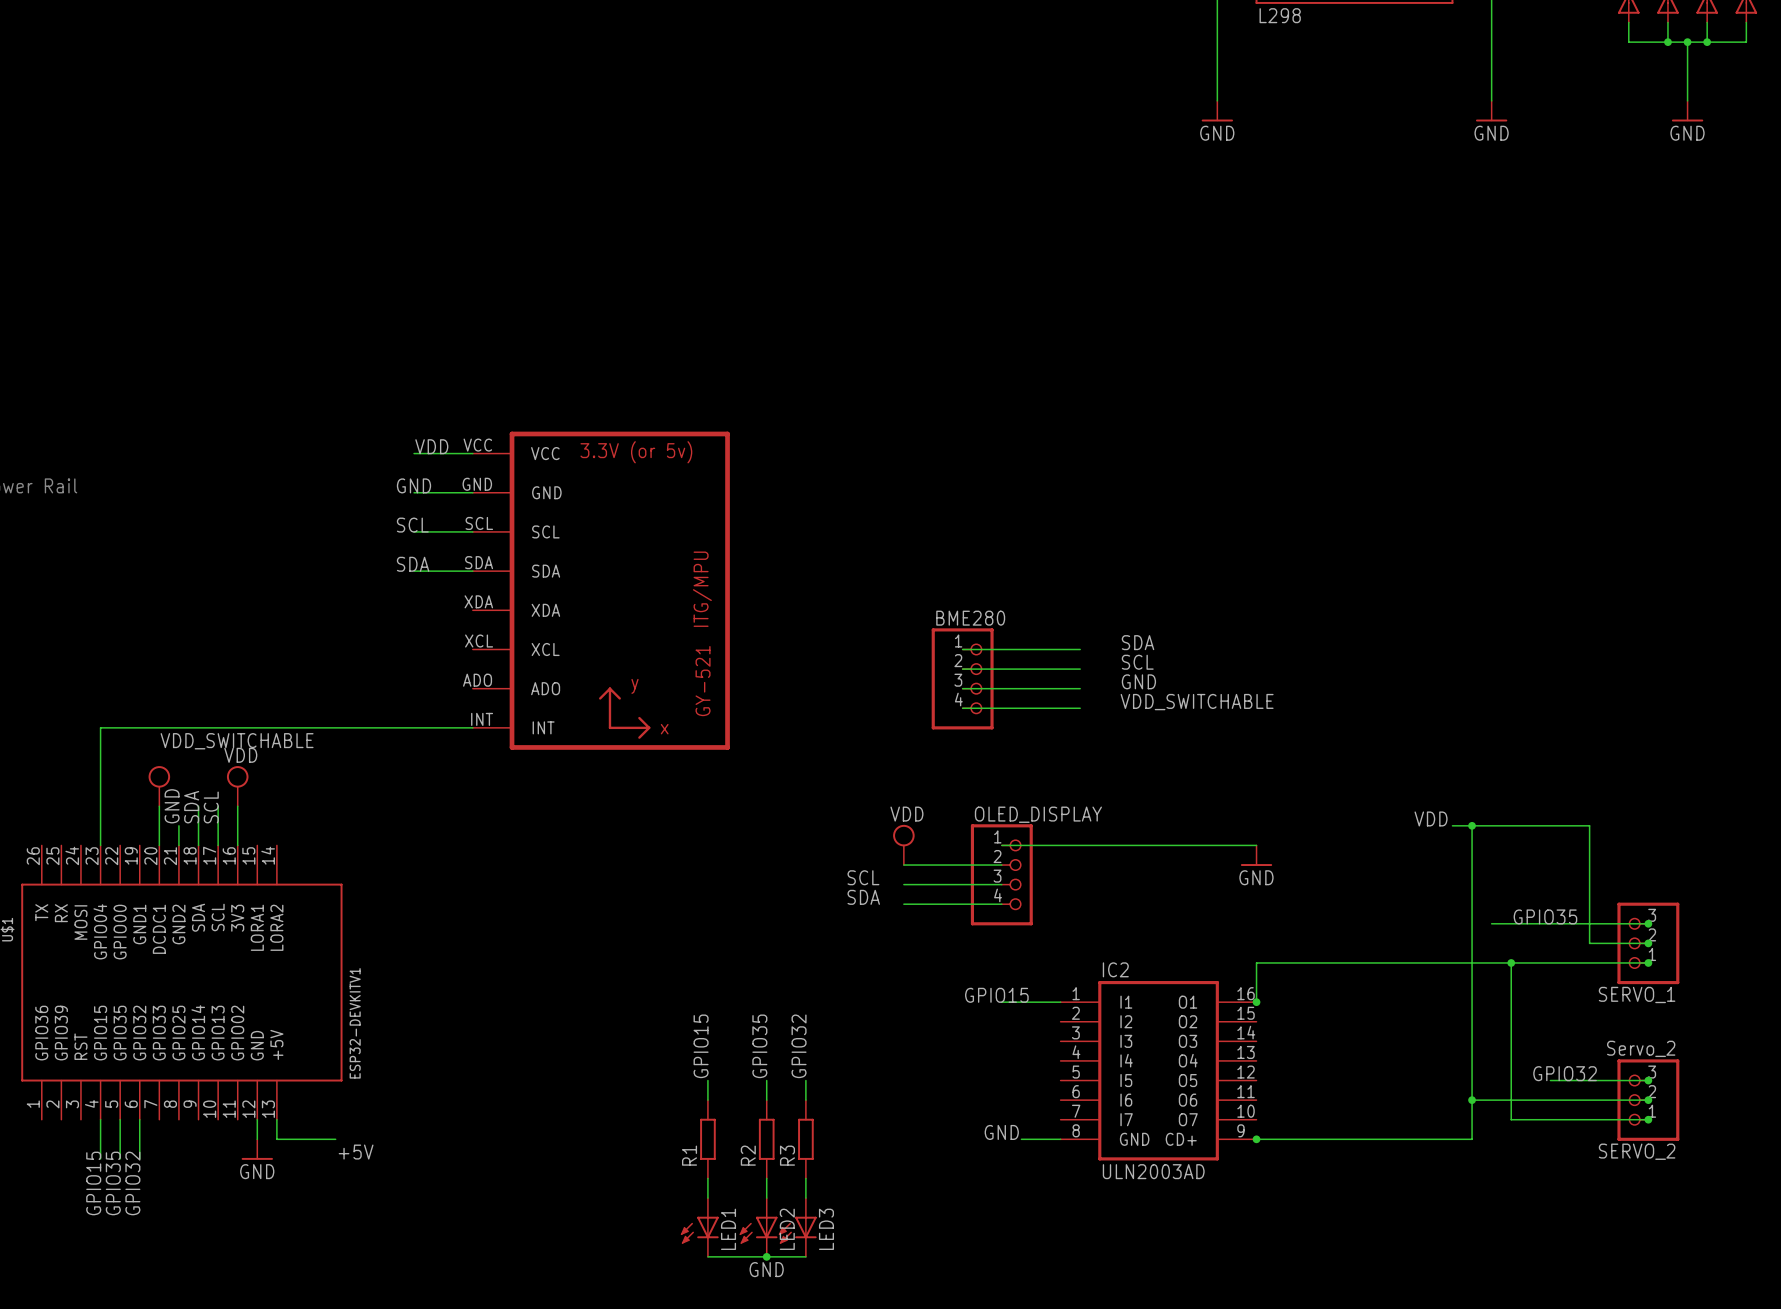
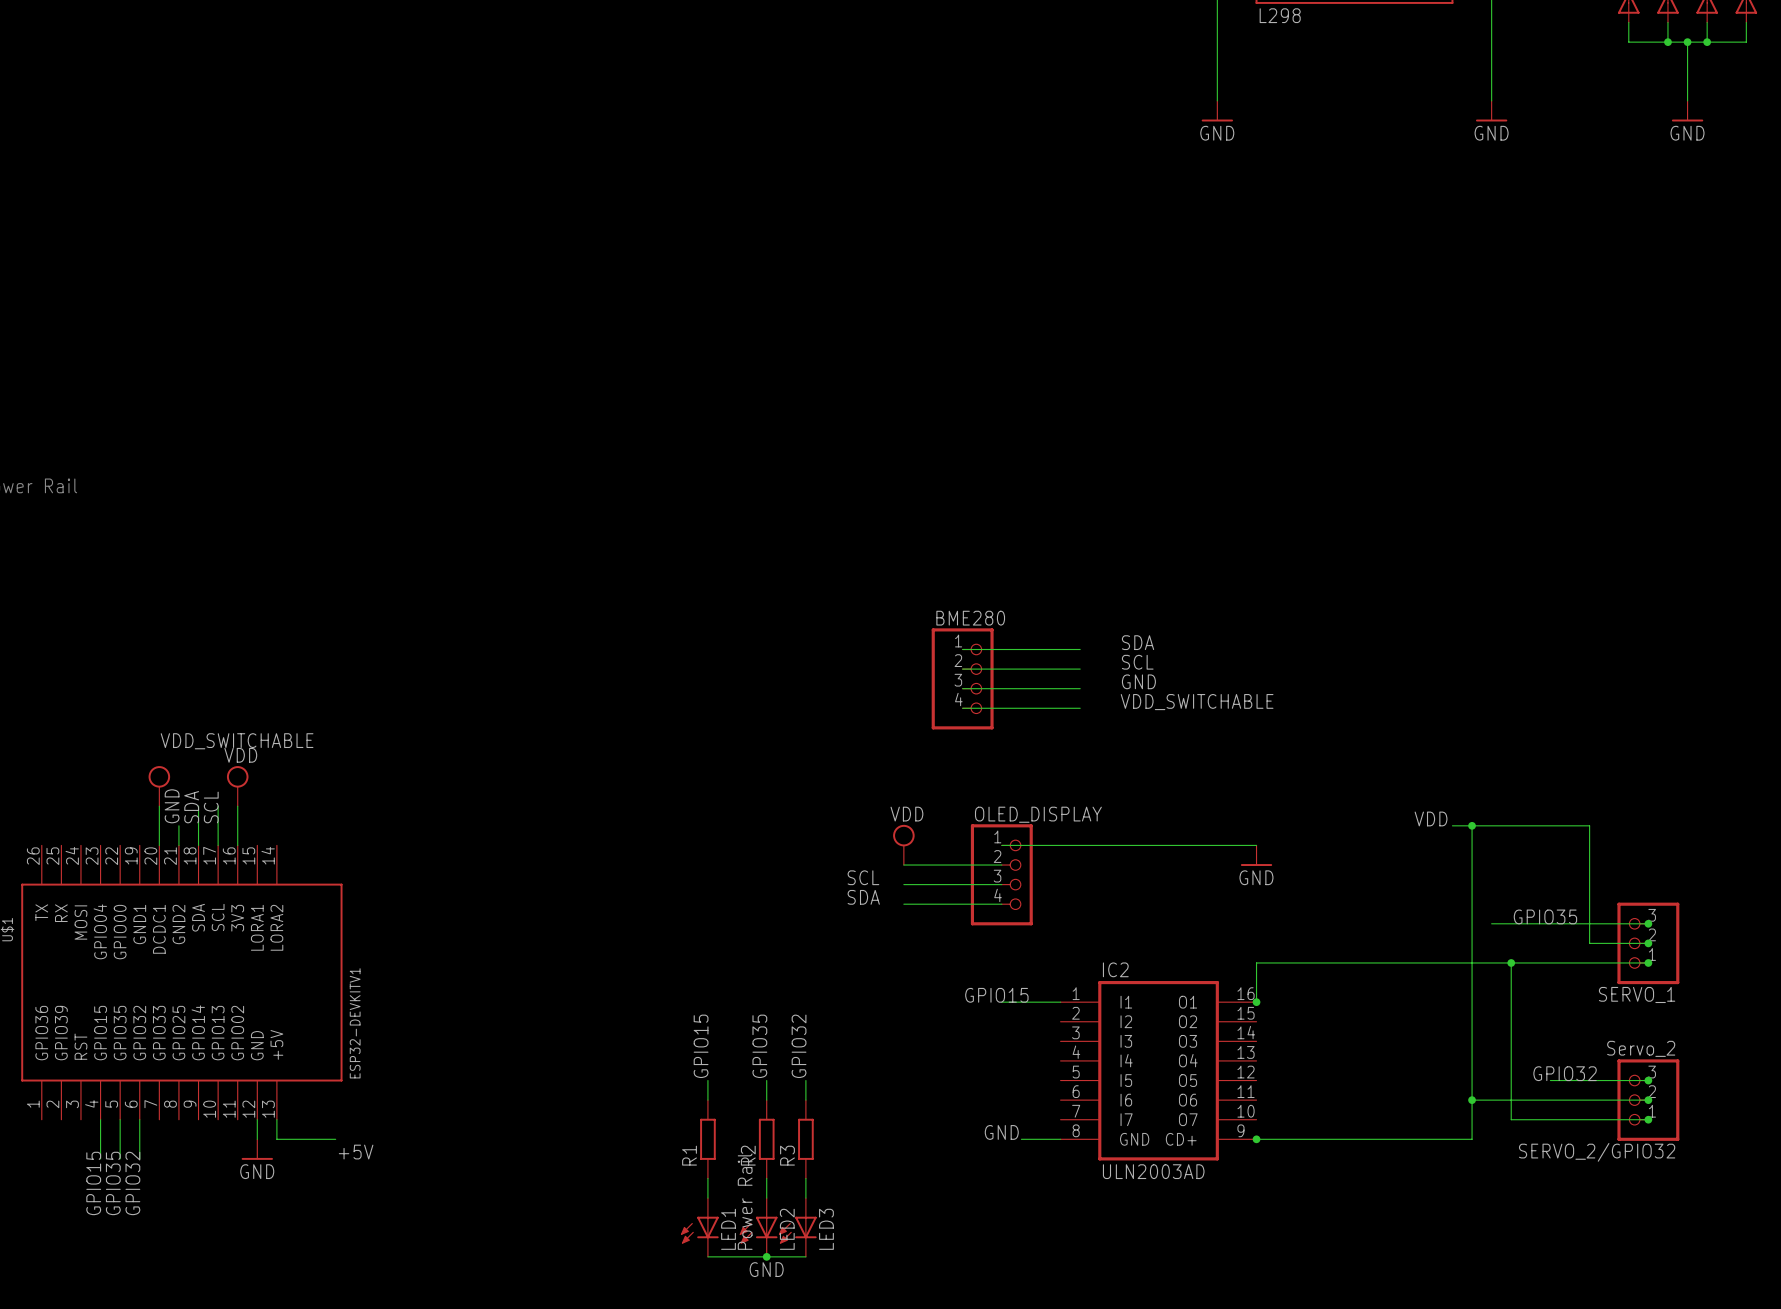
label: VDD (431, 446) -> none
wire: (414, 453) (472, 453) -> none
label: GND (413, 485) -> none
wire: (414, 492) (472, 492) -> none
label: SCL (412, 525) -> none
wire: (414, 531) (472, 531) -> none
label: SDA (413, 564) -> none
wire: (414, 571) (472, 571) -> none
part: (601, 590) -> none
wire: (472, 727) (100, 727) (100, 845) -> none
SERVO_2 name: SERVO_2 (1637, 1151) -> SERVO_2/GPIO32 (1597, 1152)
LED1 value: none -> Power Rail (745, 1201)

